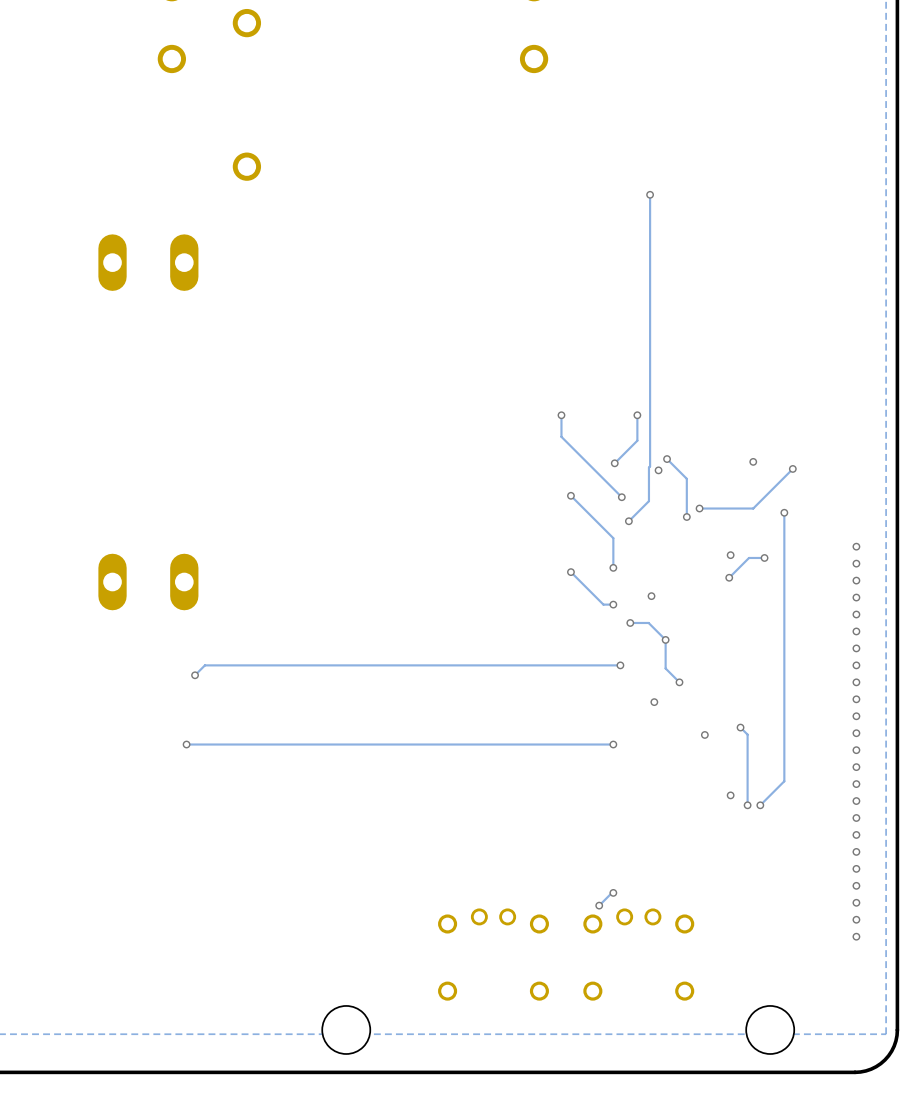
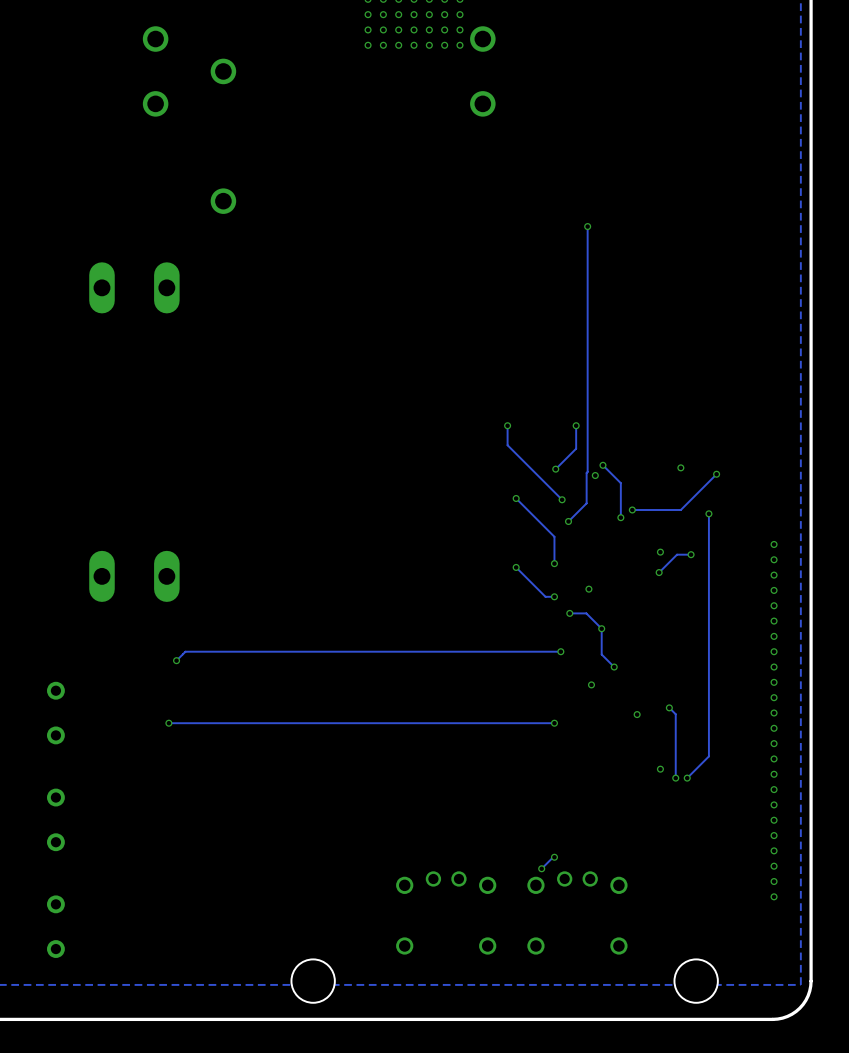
part: none -> (55, 713)
part: none -> (55, 819)
part: none -> (55, 926)

